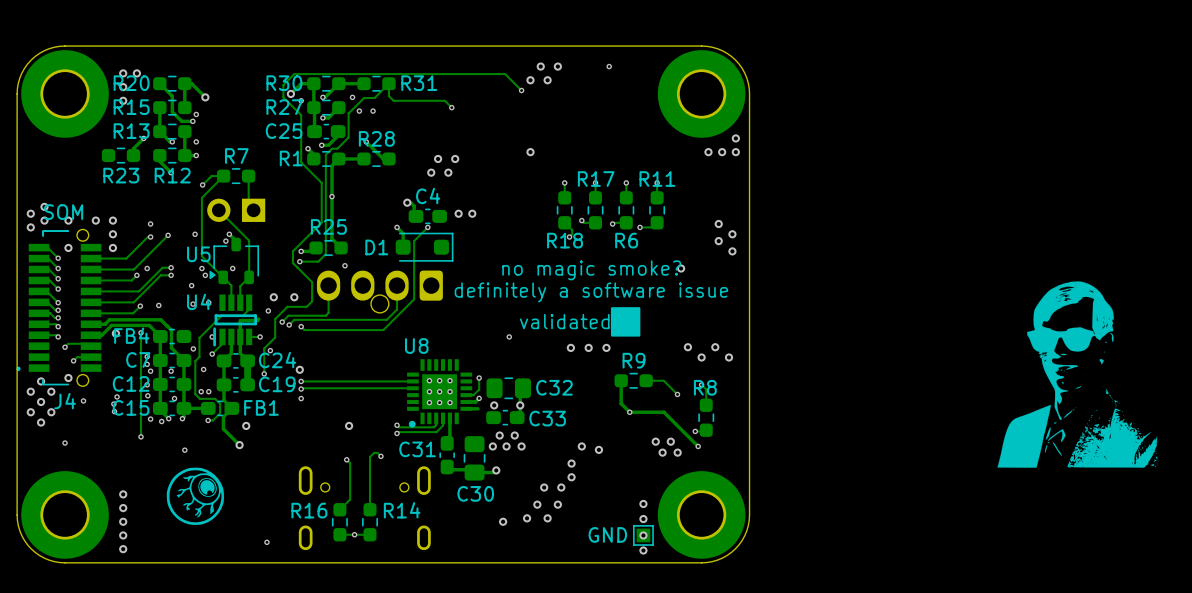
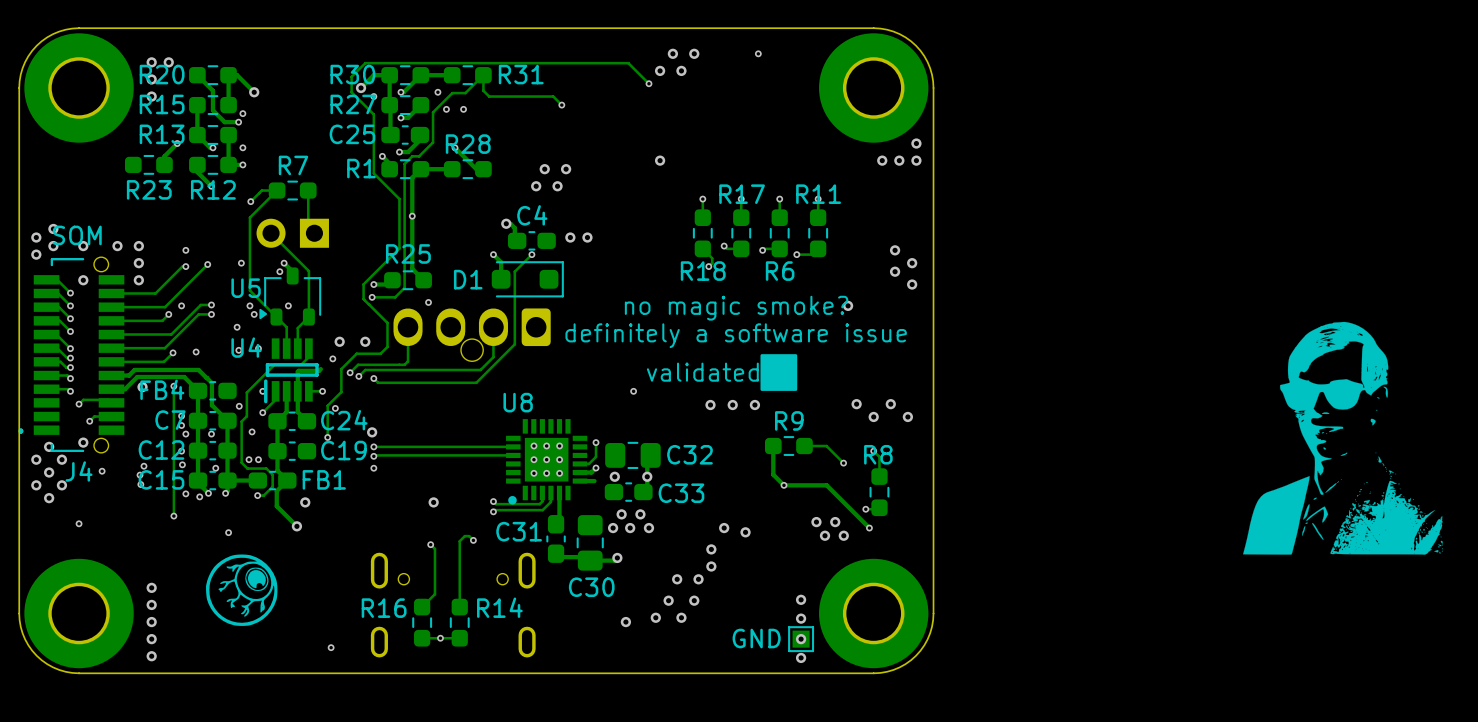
track: (247, 360) (247, 384) -> none

